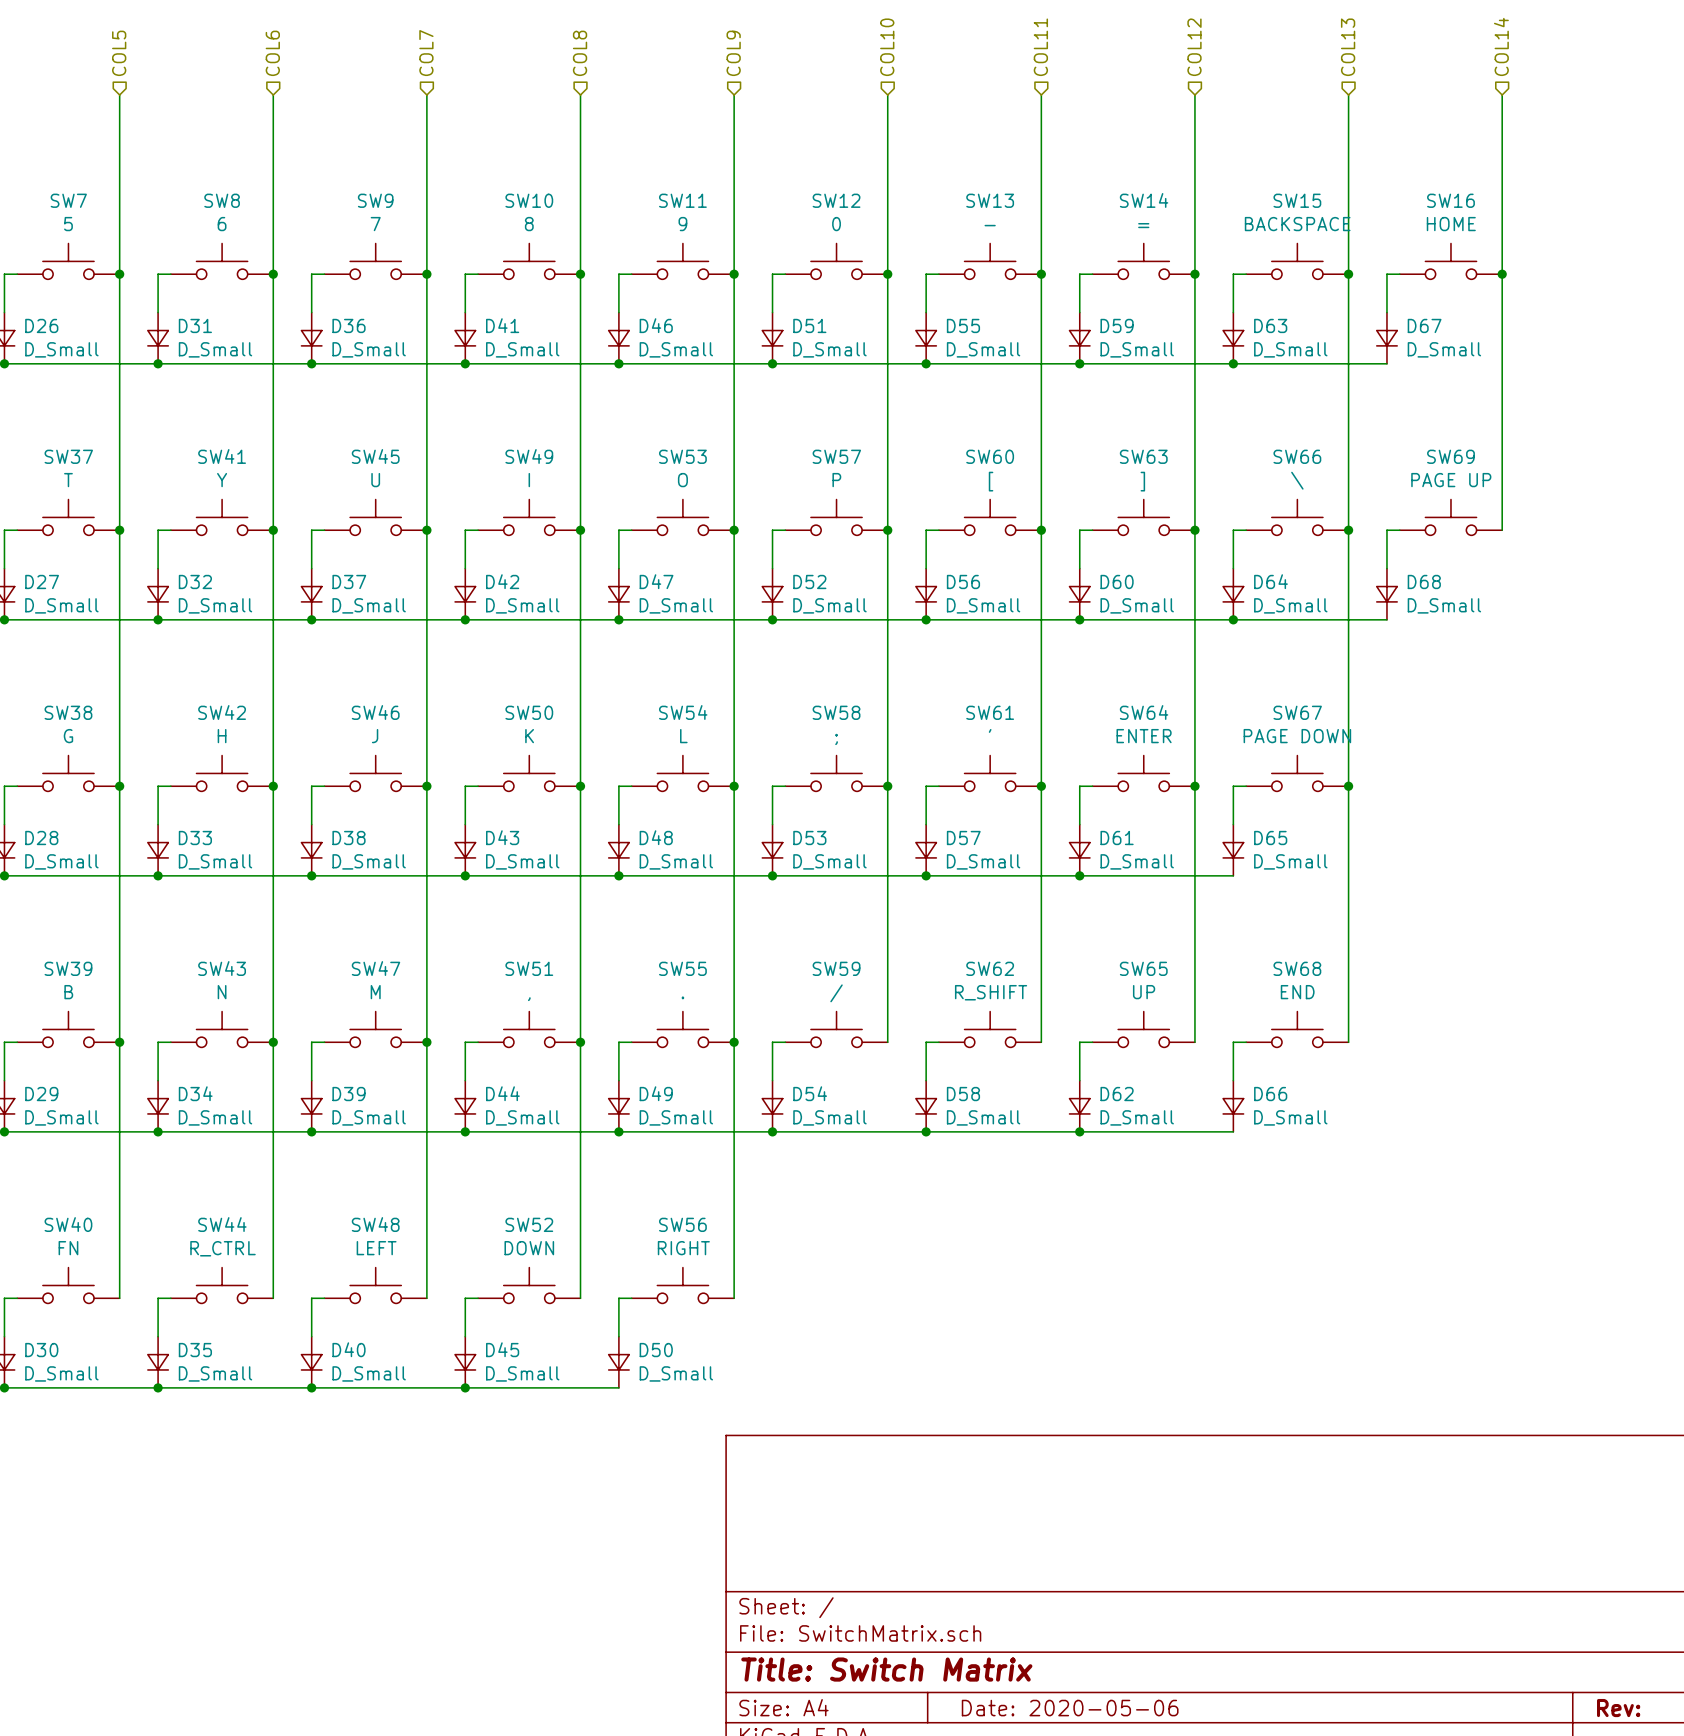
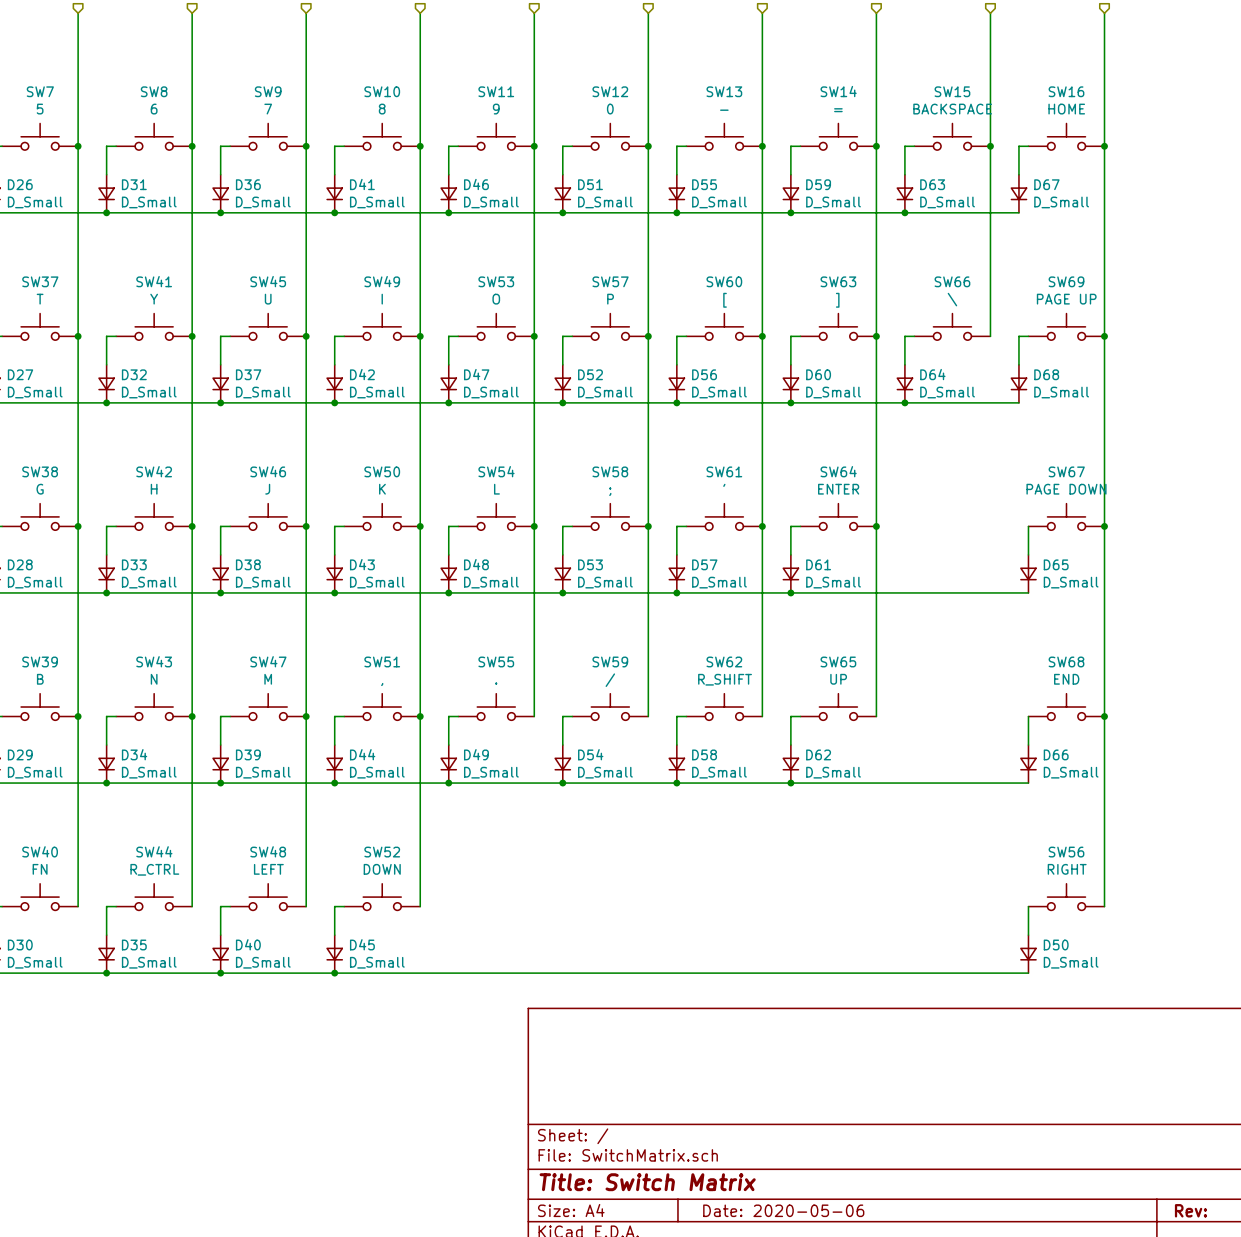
wire: (1348, 530) (1348, 1042) -> none
junction: (1348, 530) -> none
wire: none -> (1104, 336) (1104, 906)
junction: none -> (1104, 336)
SW67 position: (1297, 773) -> (1066, 516)
wire: (1246, 786) (1233, 786) (1233, 824) -> none
junction: (1348, 786) -> none
wire: none -> (1028, 526) (1028, 554)
junction: none -> (1104, 526)
D65 position: (1233, 850) -> (1028, 573)
wire: none -> (904, 592) (1028, 592)
SW68 position: (1297, 1029) -> (1066, 707)
wire: (734, 1042) (734, 1298) -> none
junction: (734, 1042) -> none
wire: (1246, 1042) (1233, 1042) (1233, 1080) -> none
wire: none -> (1028, 716) (1028, 745)
junction: none -> (1104, 716)
D66 position: (1233, 1106) -> (1028, 764)
wire: none -> (904, 783) (1028, 783)
SW56 position: (682, 1285) -> (1066, 897)
wire: (631, 1298) (618, 1298) (618, 1336) -> none
wire: none -> (1028, 906) (1028, 935)
D50 position: (618, 1362) -> (1028, 954)
wire: none -> (448, 973) (1028, 973)

